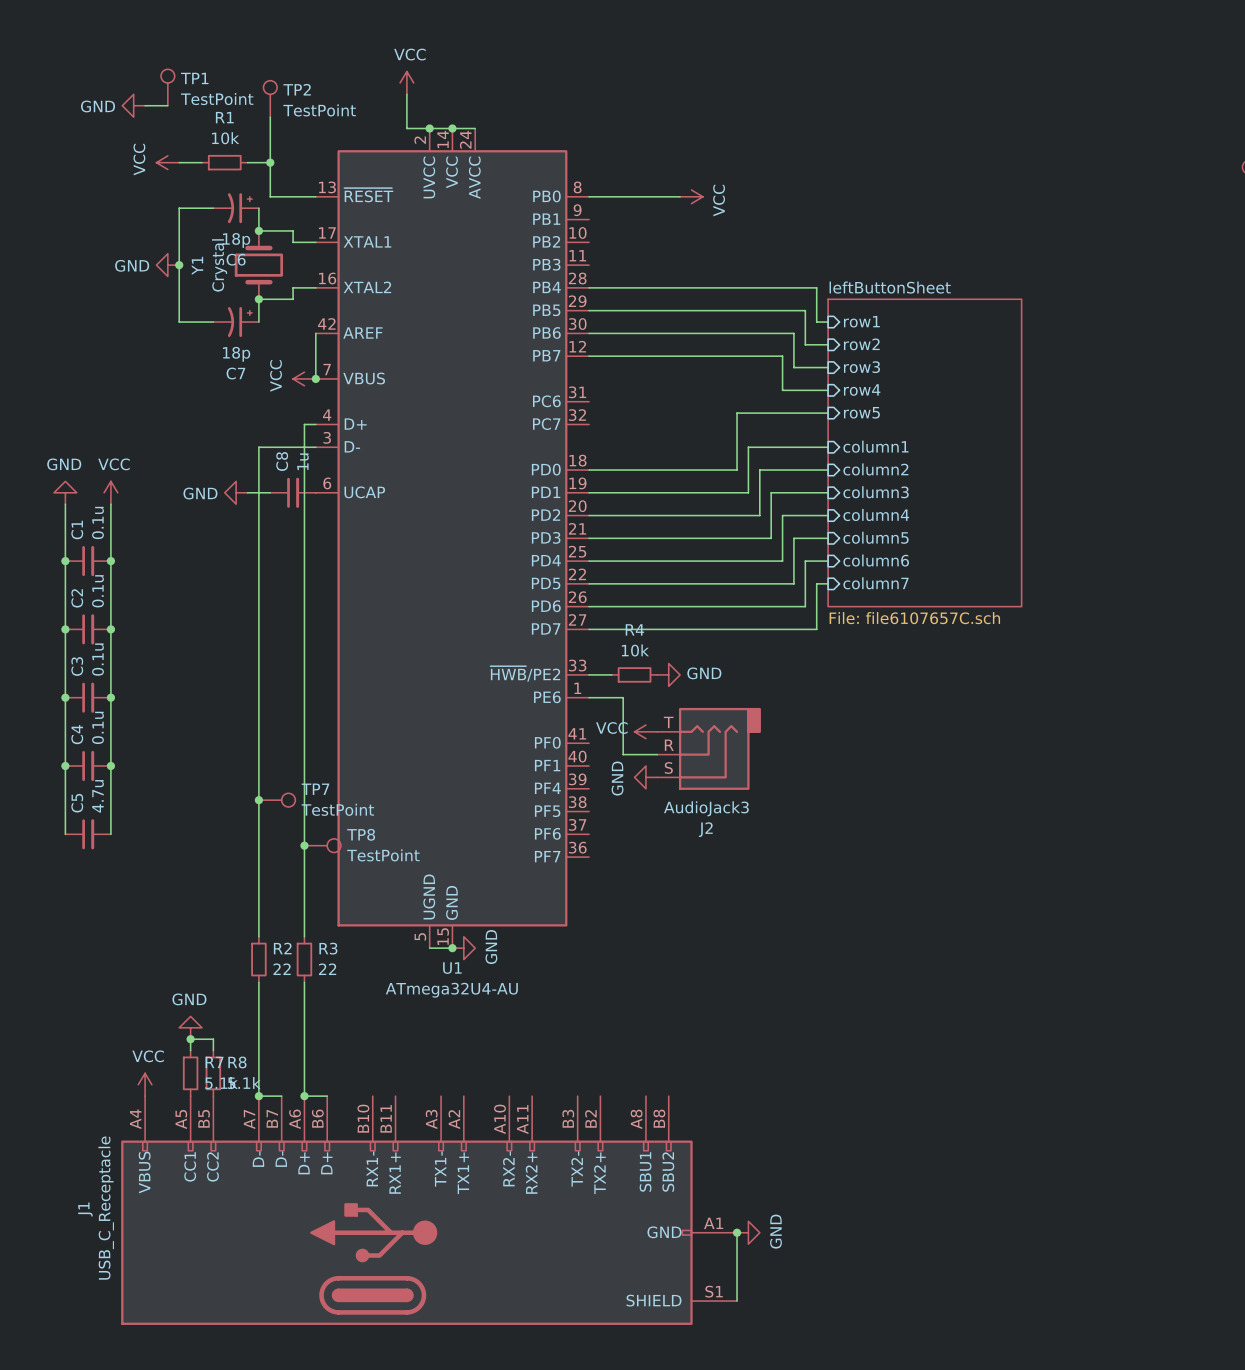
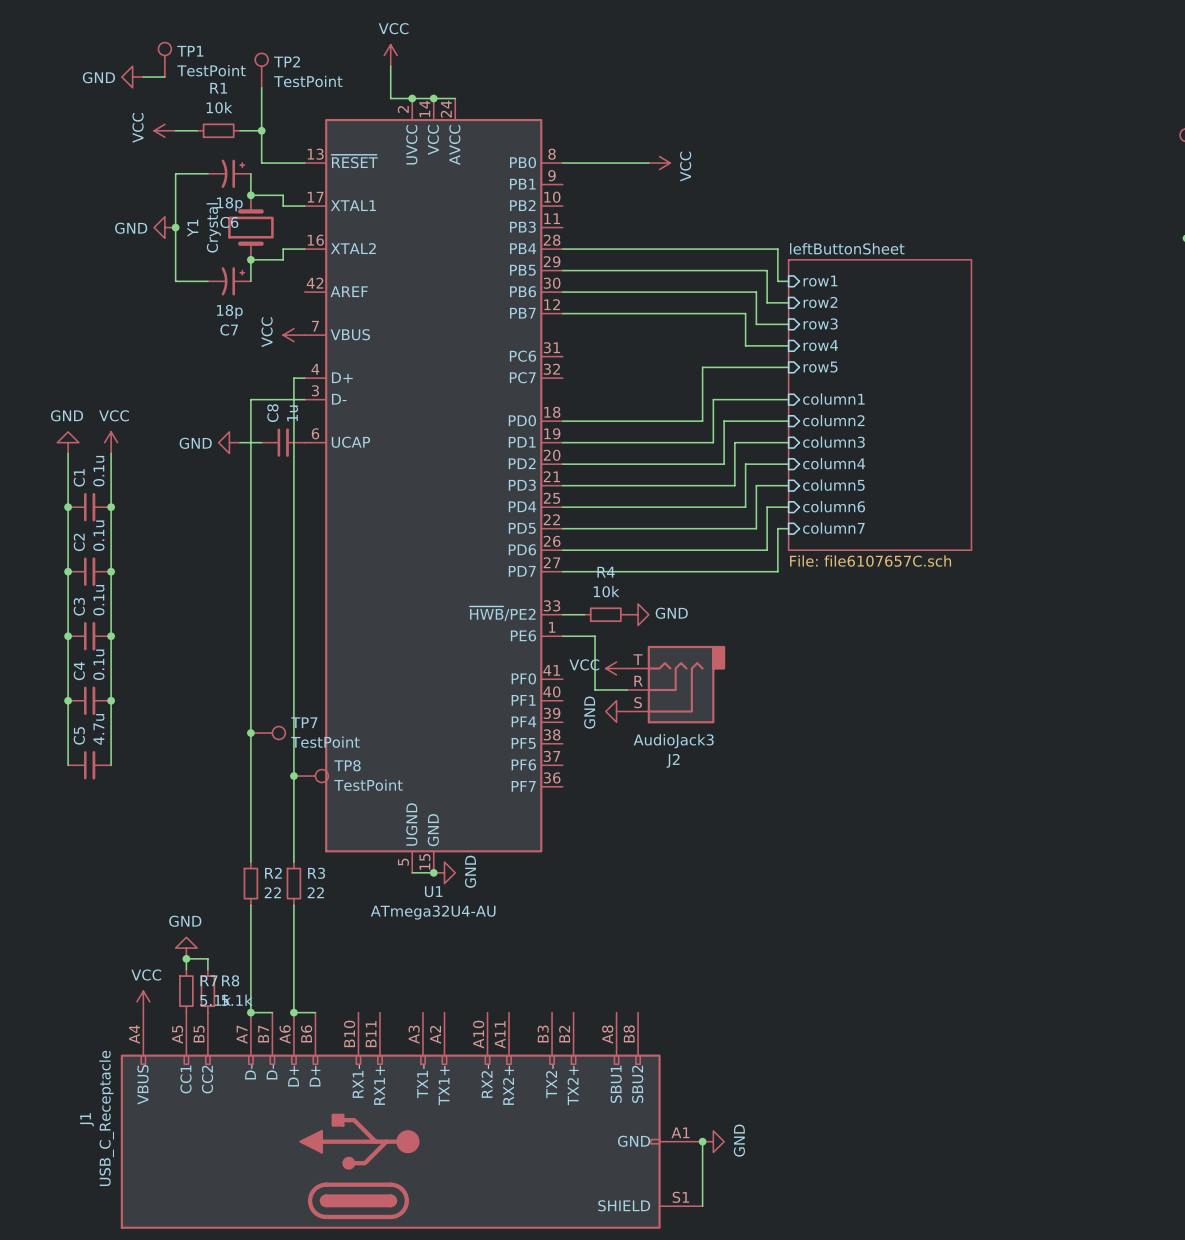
wire: (315, 333) (315, 378) -> none
junction: (315, 378) -> none

